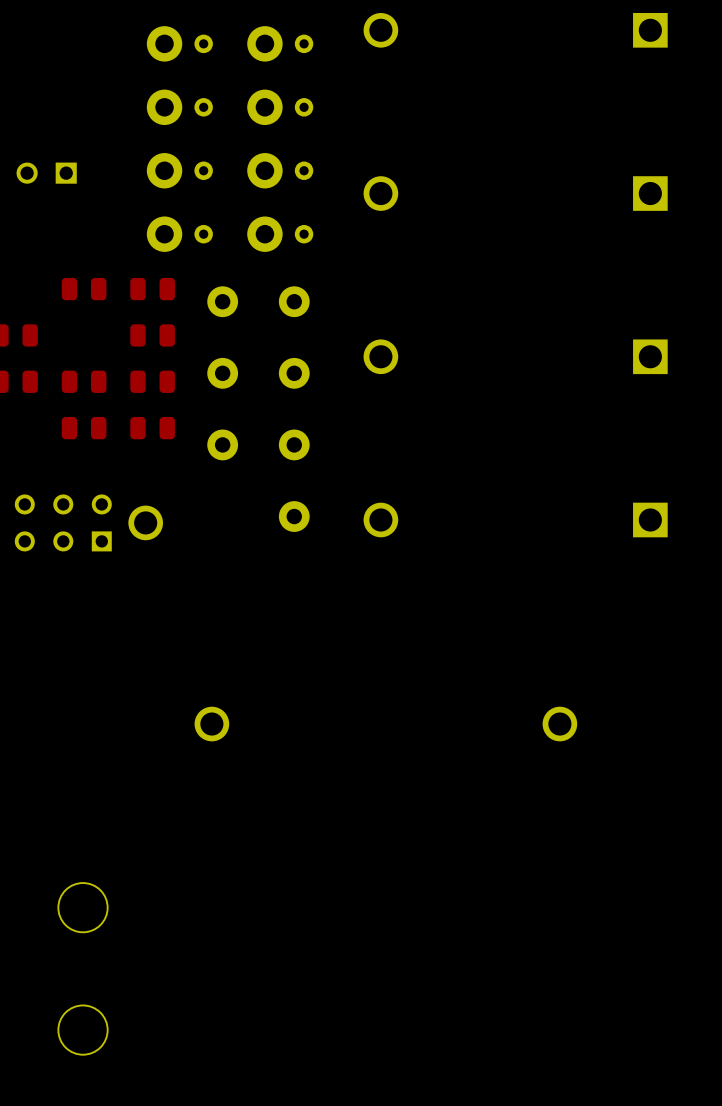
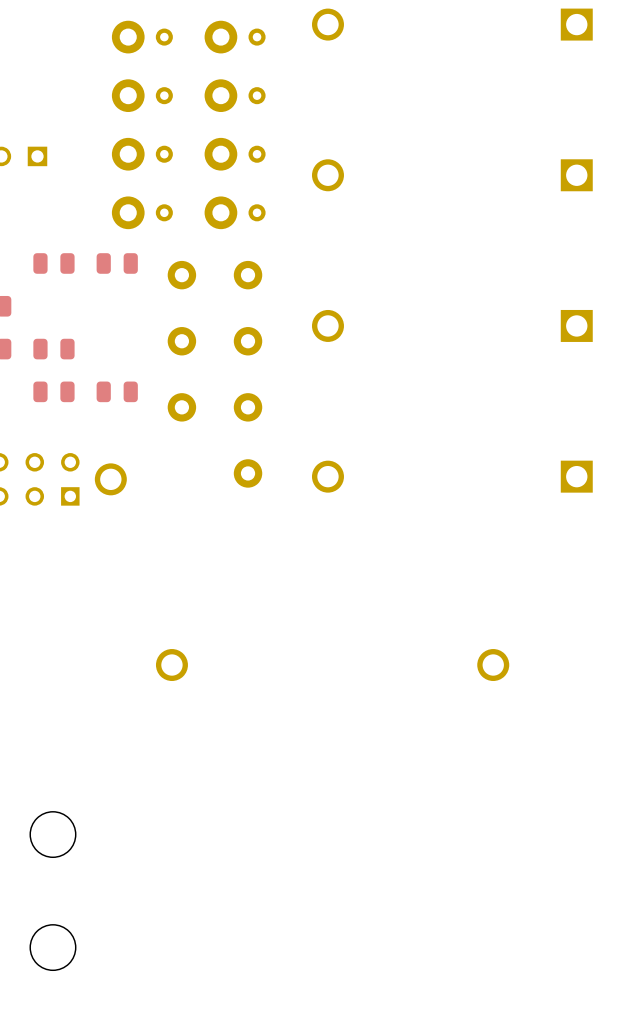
part: (152, 335) -> none
part: (152, 381) -> none

